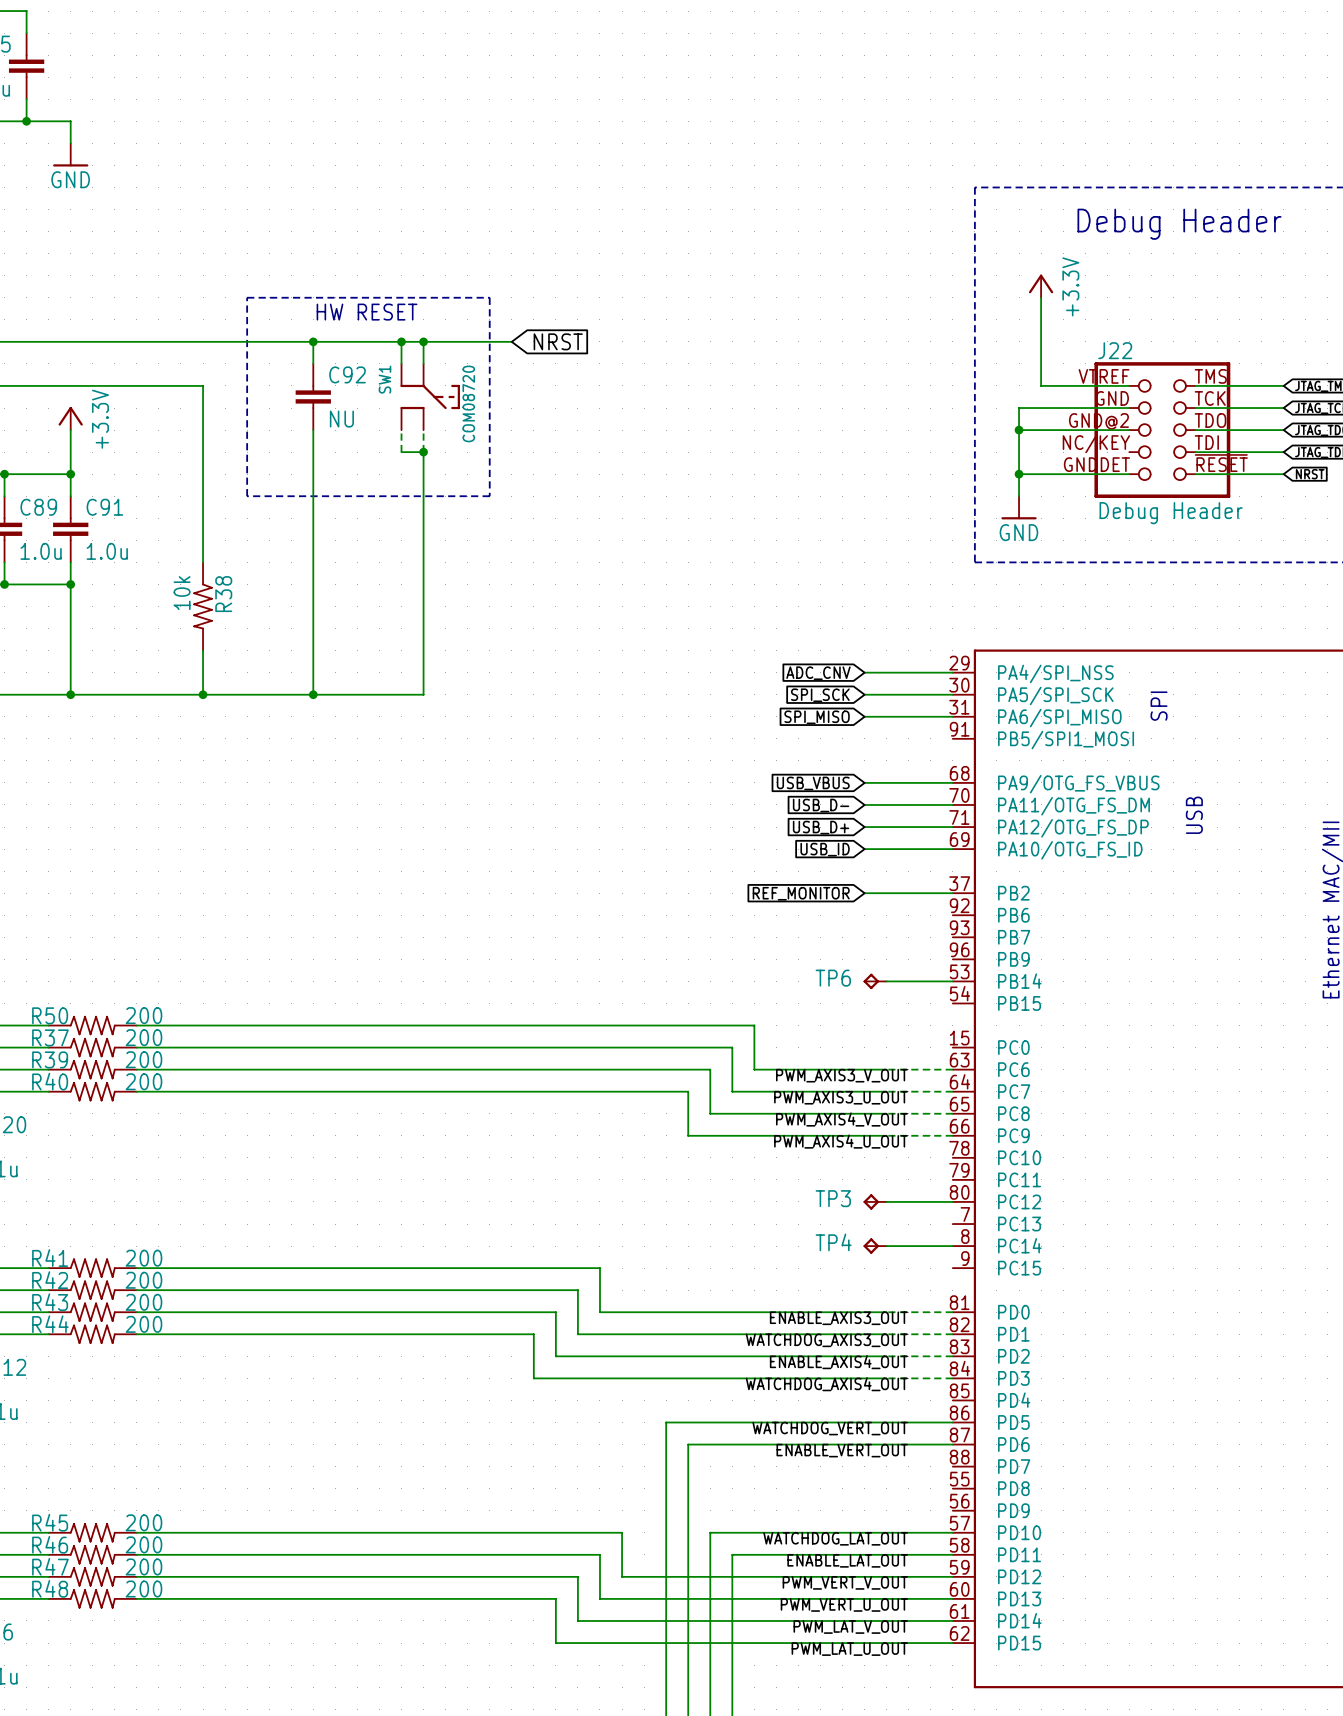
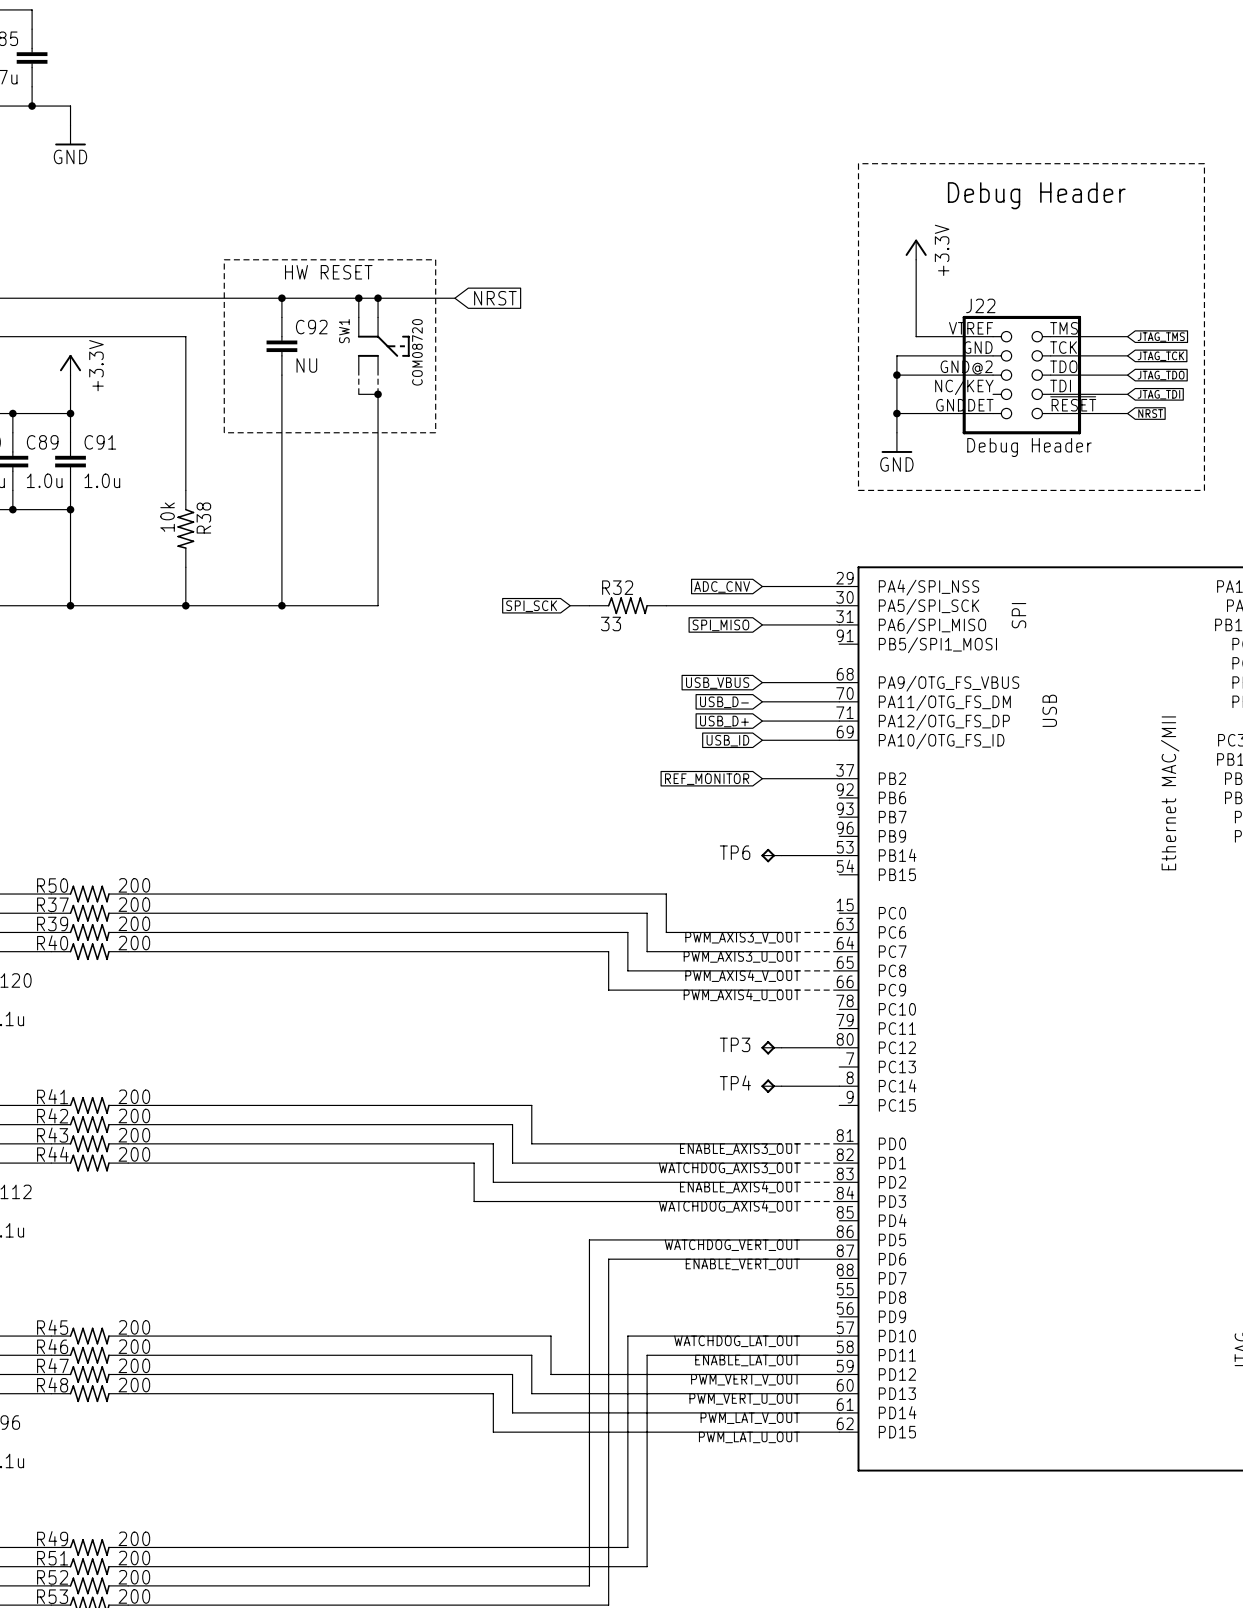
wire: none -> (570, 605) (589, 605)
R32: none -> 33 (627, 605)
wire: none -> (666, 605) (762, 605)
global label: none -> SPI_SCK (531, 606)
global label: SPI_SCK (820, 695) -> none

